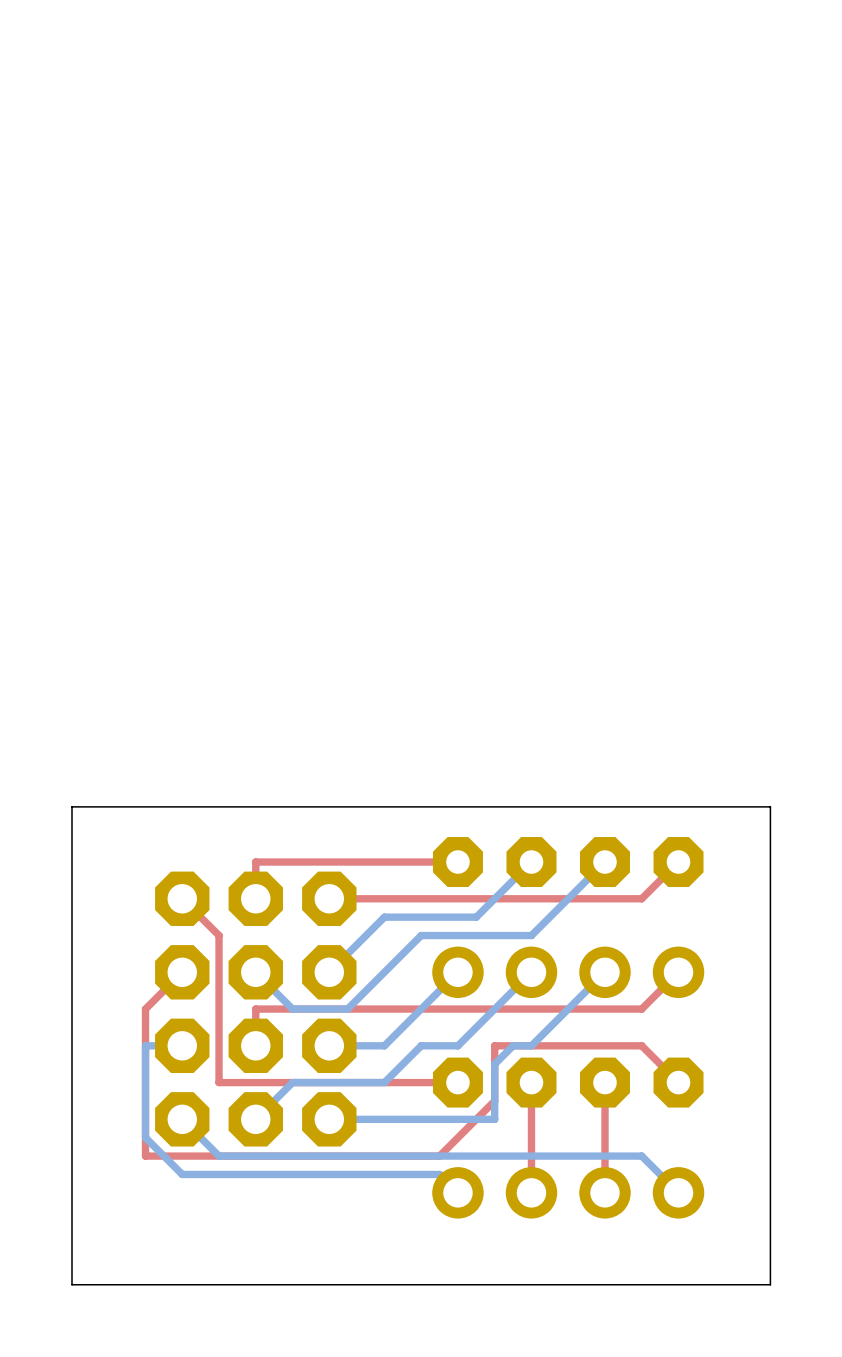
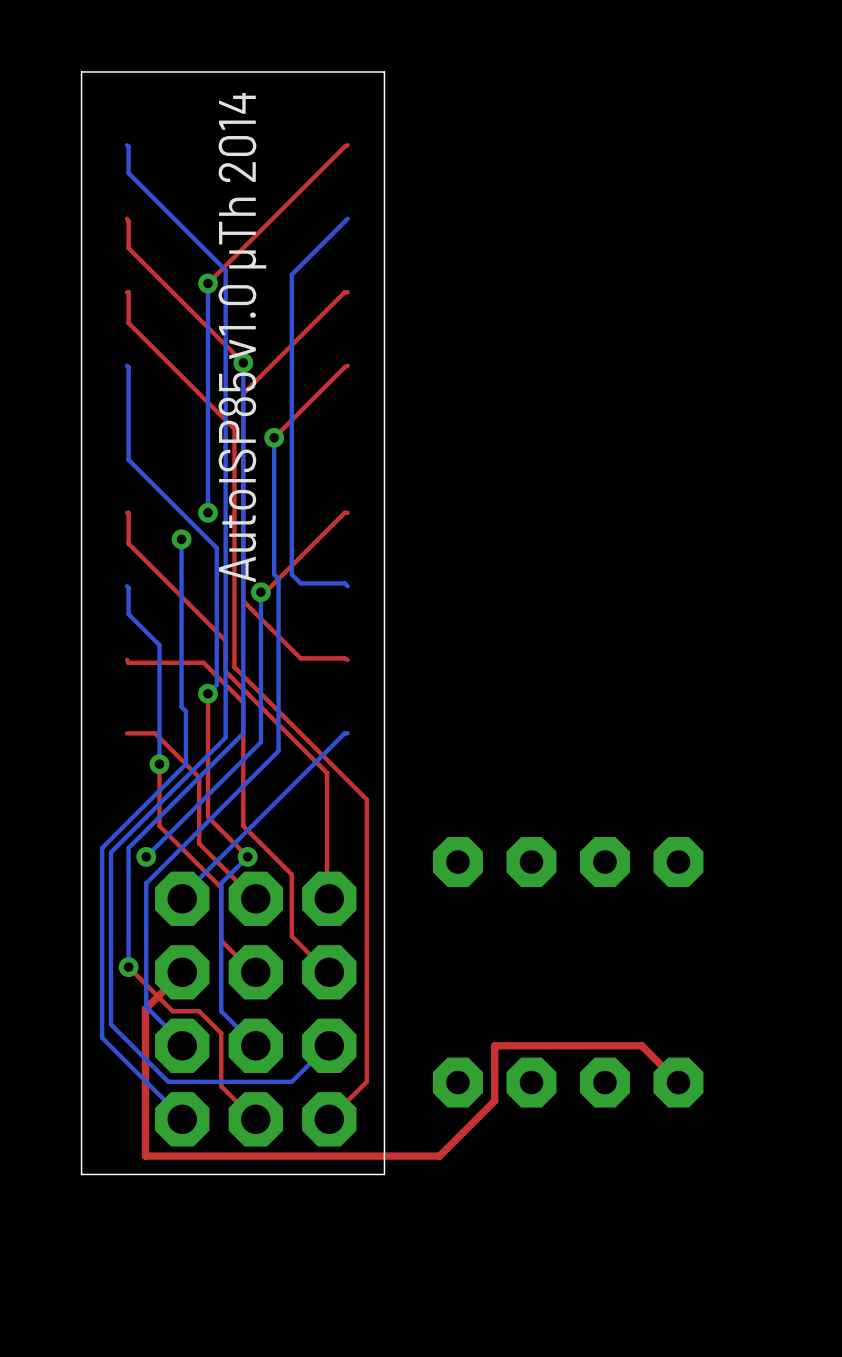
board edge: none -> (384, 71) (81, 71) (81, 1174) (384, 1174) (384, 71)
top track: none -> (347, 145) (208, 283)
top track: none -> (127, 218) (128, 248) (243, 362)
bottom track: none -> (347, 218) (291, 274) (291, 574) (300, 583) (344, 583) (347, 586)
bottom track: none -> (208, 283) (208, 512)
via: none -> (208, 283)
top track: none -> (127, 292) (128, 323) (234, 429) (234, 667) (366, 799) (366, 1081) (329, 1119)
top track: none -> (347, 292) (344, 292) (243, 393) (243, 601) (300, 658) (347, 659)
bottom track: none -> (243, 362) (243, 733) (128, 848) (128, 967)
via: none -> (243, 362)
bottom track: none -> (127, 365) (128, 459) (216, 548) (216, 684) (208, 693)
top track: none -> (347, 365) (274, 437)
text: none -> AutoISP85 v1.0 µTh 2014 (242, 337)
via: none -> (274, 437)
via: none -> (208, 512)
top track: none -> (347, 512) (344, 512) (265, 592) (260, 592)
via: none -> (181, 539)
bottom track: none -> (127, 586) (128, 614) (159, 645) (159, 764)
bottom track: none -> (260, 592) (260, 742) (146, 856)
via: none -> (260, 592)
top track: none -> (127, 659) (128, 662) (203, 662) (243, 702) (243, 826) (291, 874) (291, 936) (329, 972)
top track: none -> (208, 693) (208, 817) (247, 856)
via: none -> (208, 693)
bottom track: none -> (347, 733) (344, 733) (181, 896) (182, 898)
top track: none -> (159, 764) (159, 826) (221, 887) (221, 940) (252, 971) (255, 972)
via: none -> (159, 764)
board edge: (770, 806) (71, 806) (71, 1284) (770, 1284) (770, 806) -> none
via: none -> (146, 856)
bottom track: none -> (247, 856) (221, 883) (221, 1011) (255, 1045)
via: none -> (247, 856)
top track: (457, 862) (255, 862) (255, 898) -> (127, 733) (155, 733) (199, 777) (199, 843) (255, 898)
bottom track: (531, 862) (476, 917) (384, 917) (329, 972) -> none
bottom track: (605, 862) (531, 935) (421, 935) (347, 1009) (292, 1009) (255, 972) -> none
top track: (678, 862) (641, 898) (329, 898) -> (127, 512) (128, 543) (225, 640) (225, 671) (327, 773) (327, 896) (329, 898)
top track: (182, 898) (219, 935) (219, 1082) (457, 1082) -> none
top track: none -> (128, 967) (172, 1011) (199, 1011) (221, 1033) (221, 1086) (255, 1119)
via: none -> (128, 967)
bottom track: (457, 972) (384, 1045) (329, 1045) -> (127, 145) (128, 173) (225, 270) (225, 737) (110, 852) (110, 1024) (168, 1081) (291, 1081) (329, 1045)
bottom track: (531, 972) (457, 1045) (421, 1045) (384, 1082) (292, 1082) (255, 1119) -> none
part: (568, 972) -> none
bottom track: (605, 972) (531, 1045) (513, 1045) (494, 1064) (494, 1119) (329, 1119) -> none
top track: (678, 972) (641, 1009) (255, 1009) (255, 1045) -> none
bottom track: (182, 1045) (145, 1045) (145, 1137) (182, 1174) (439, 1174) (457, 1192) -> (182, 1045) (181, 1042) (146, 1006) (146, 883) (278, 751) (278, 578) (274, 574) (274, 437)
top track: (531, 1082) (531, 1192) -> none
top track: (605, 1082) (605, 1192) -> none
bottom track: (182, 1119) (219, 1156) (641, 1156) (678, 1192) -> (182, 1119) (102, 1037) (102, 848) (185, 764) (185, 711) (181, 706) (181, 539)
part: (568, 1192) -> none

